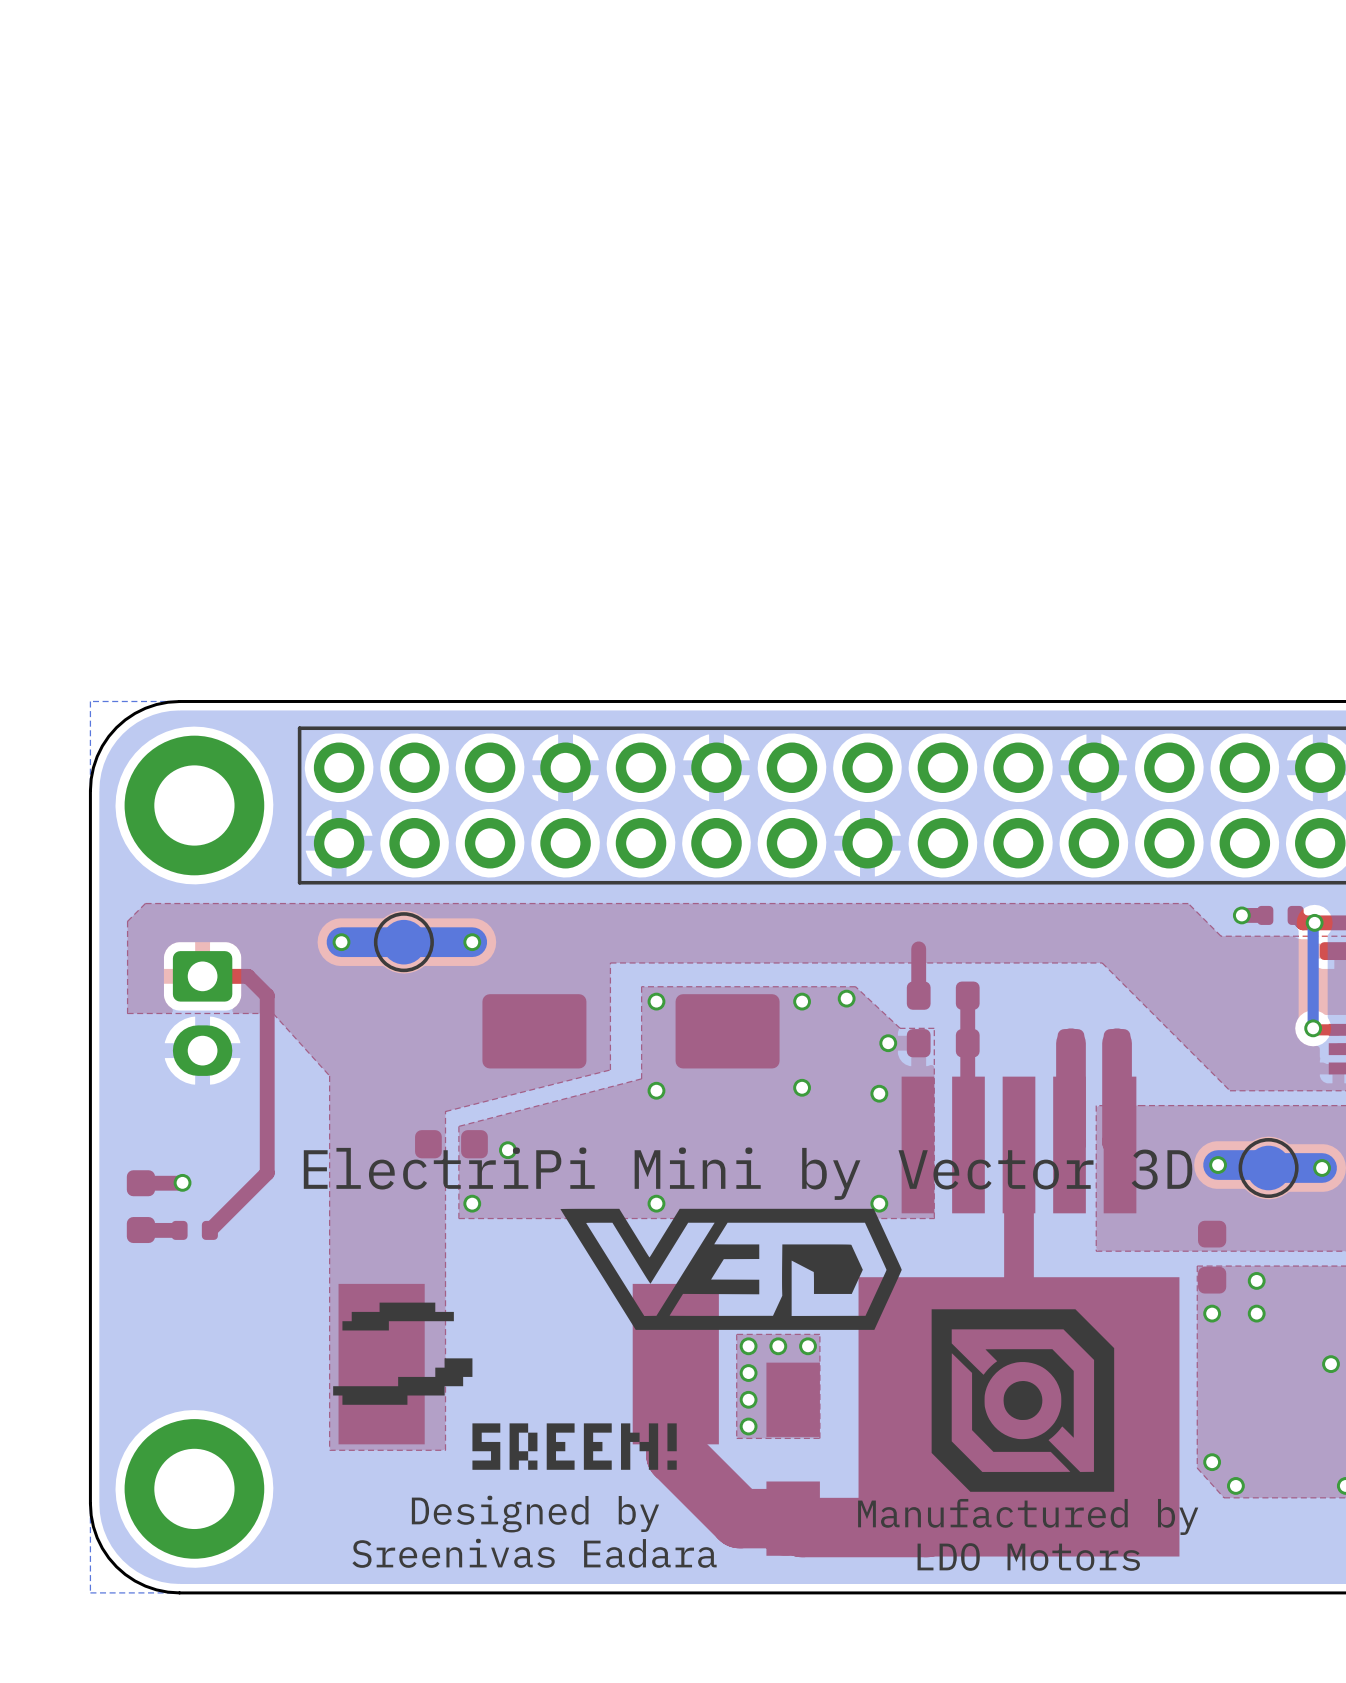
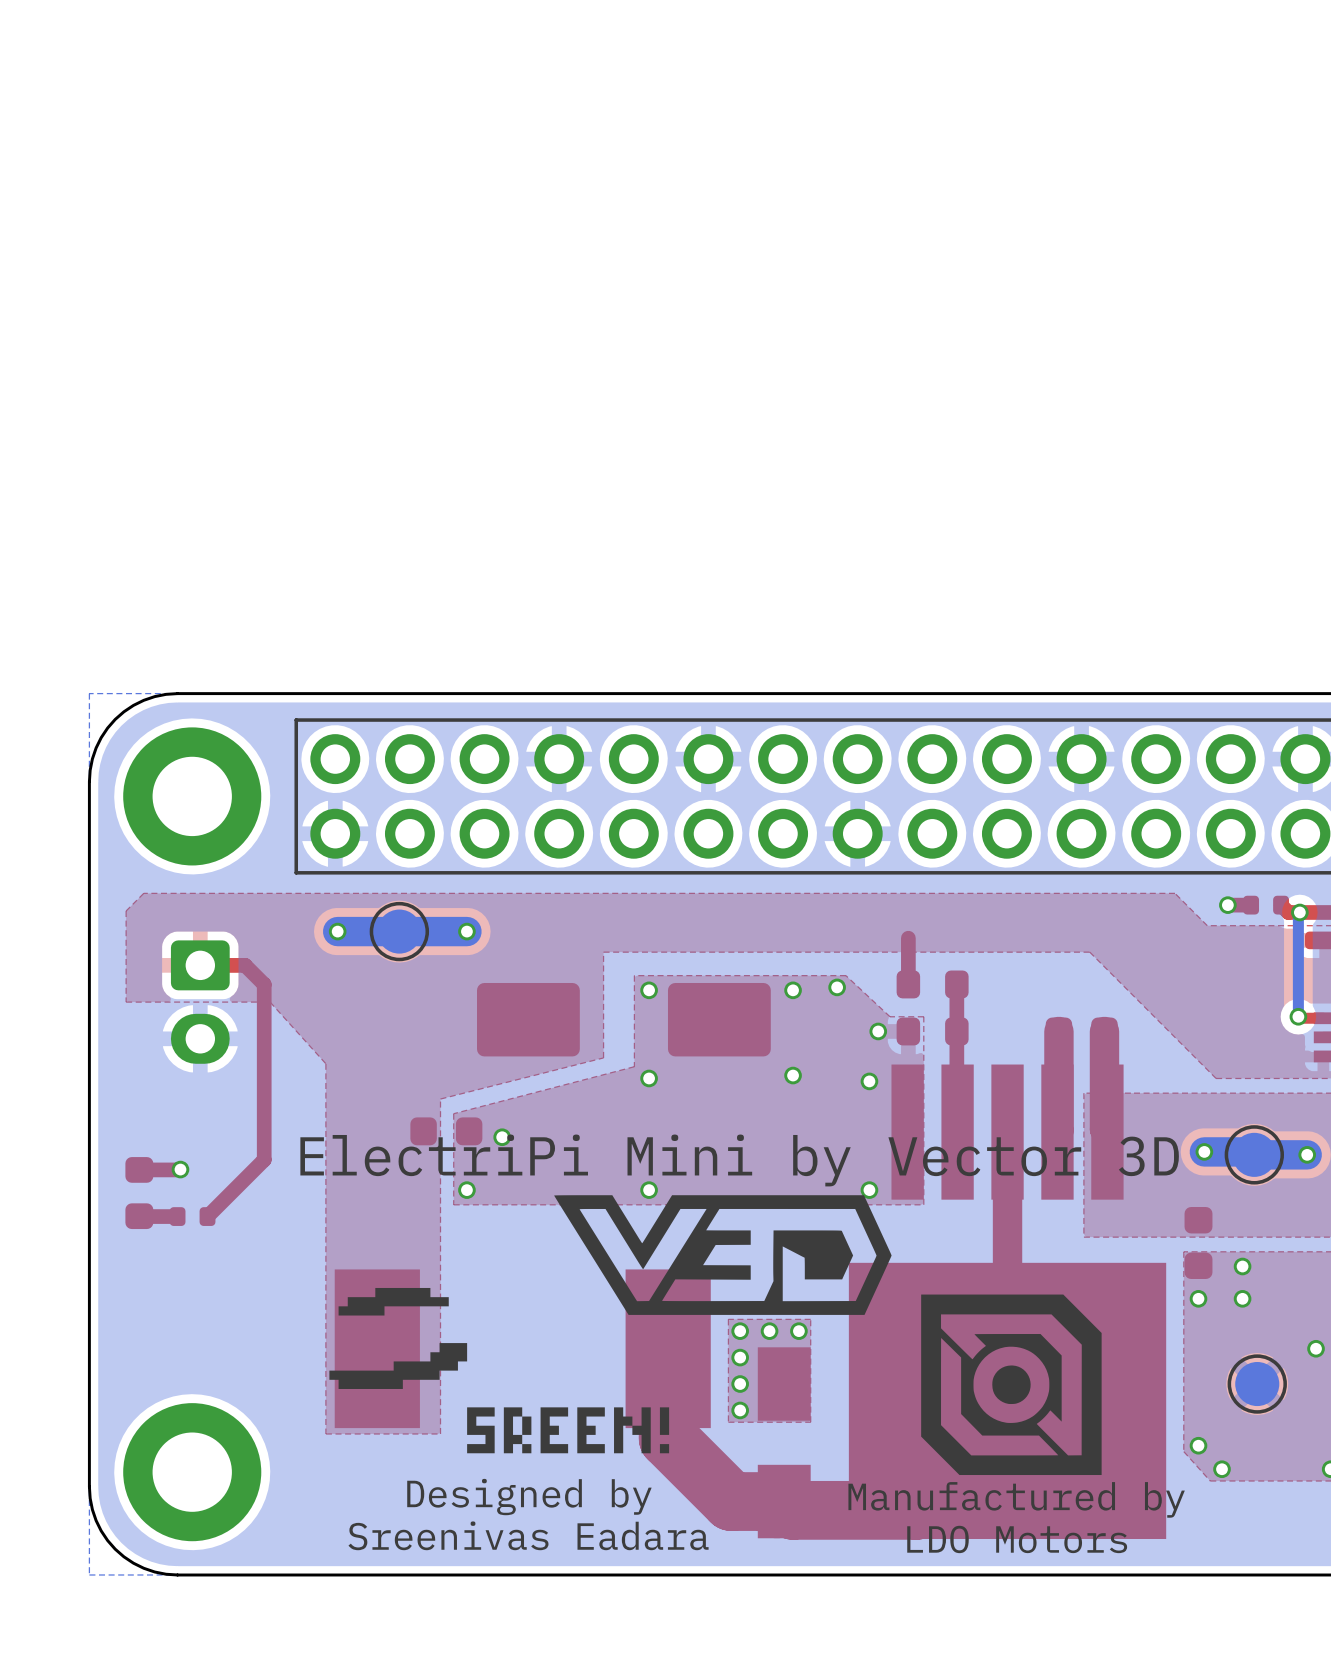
part: none -> (1257, 1384)

